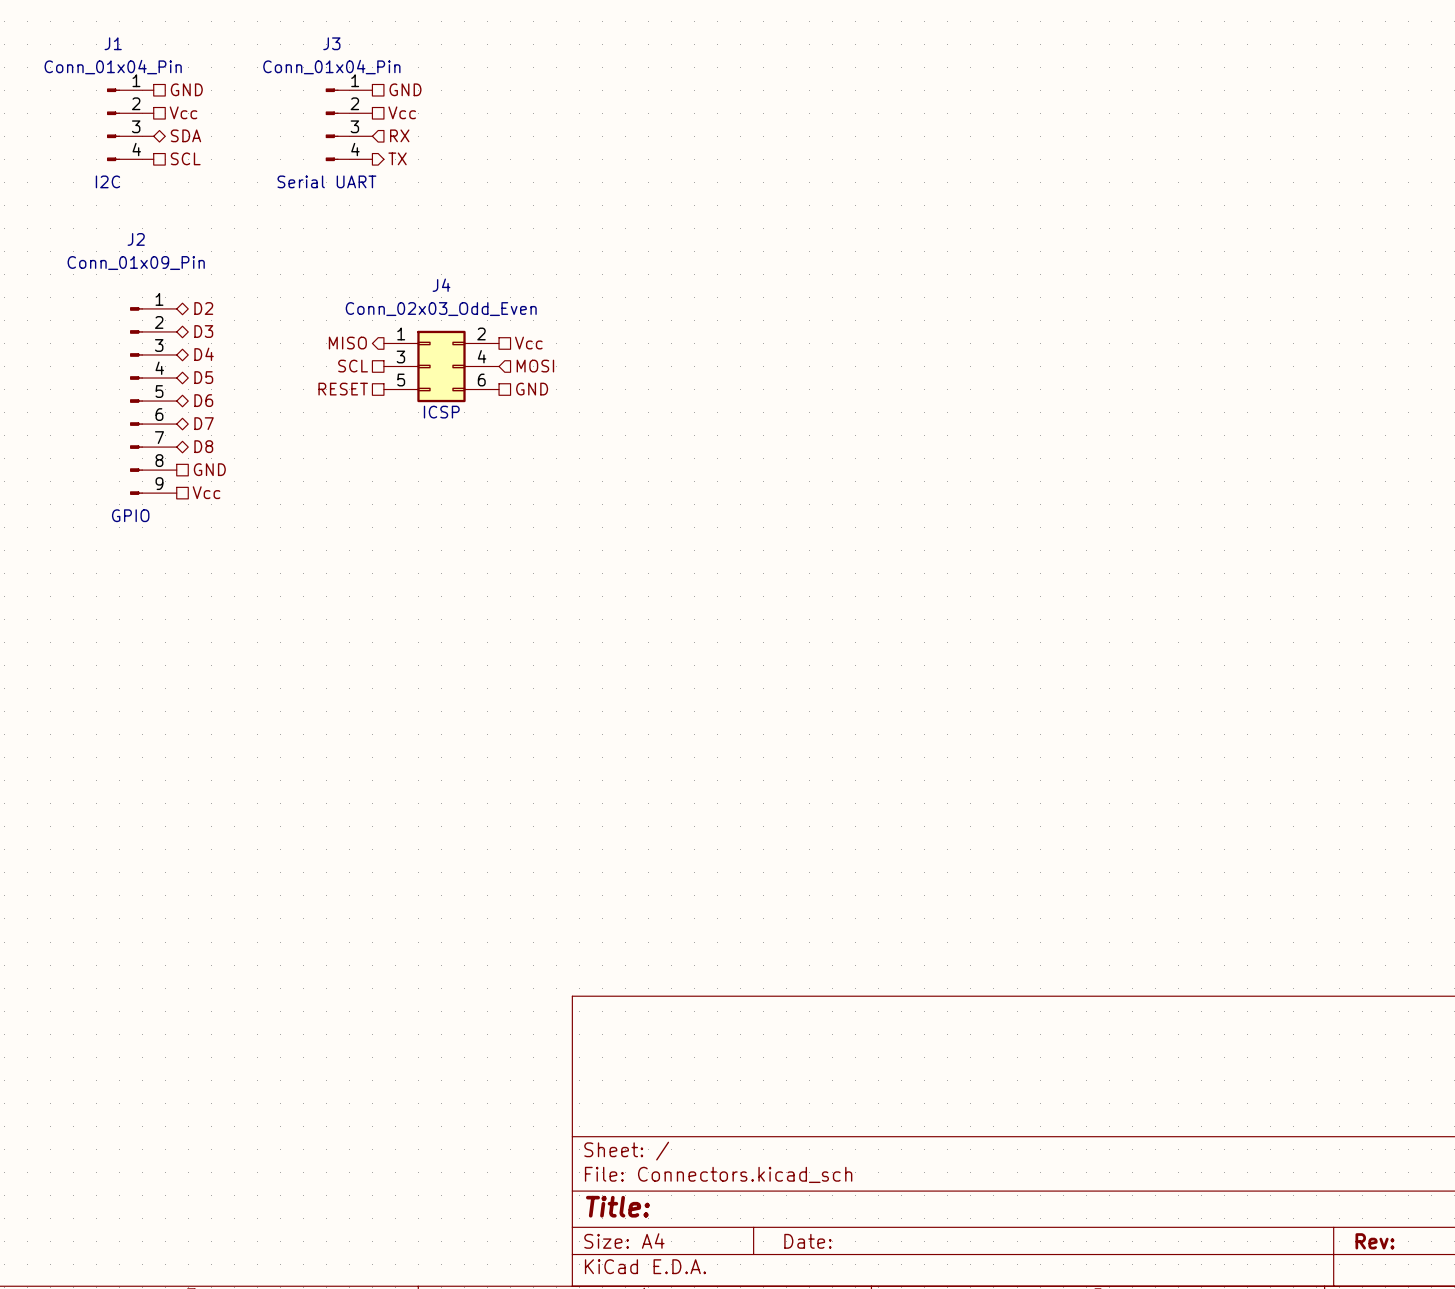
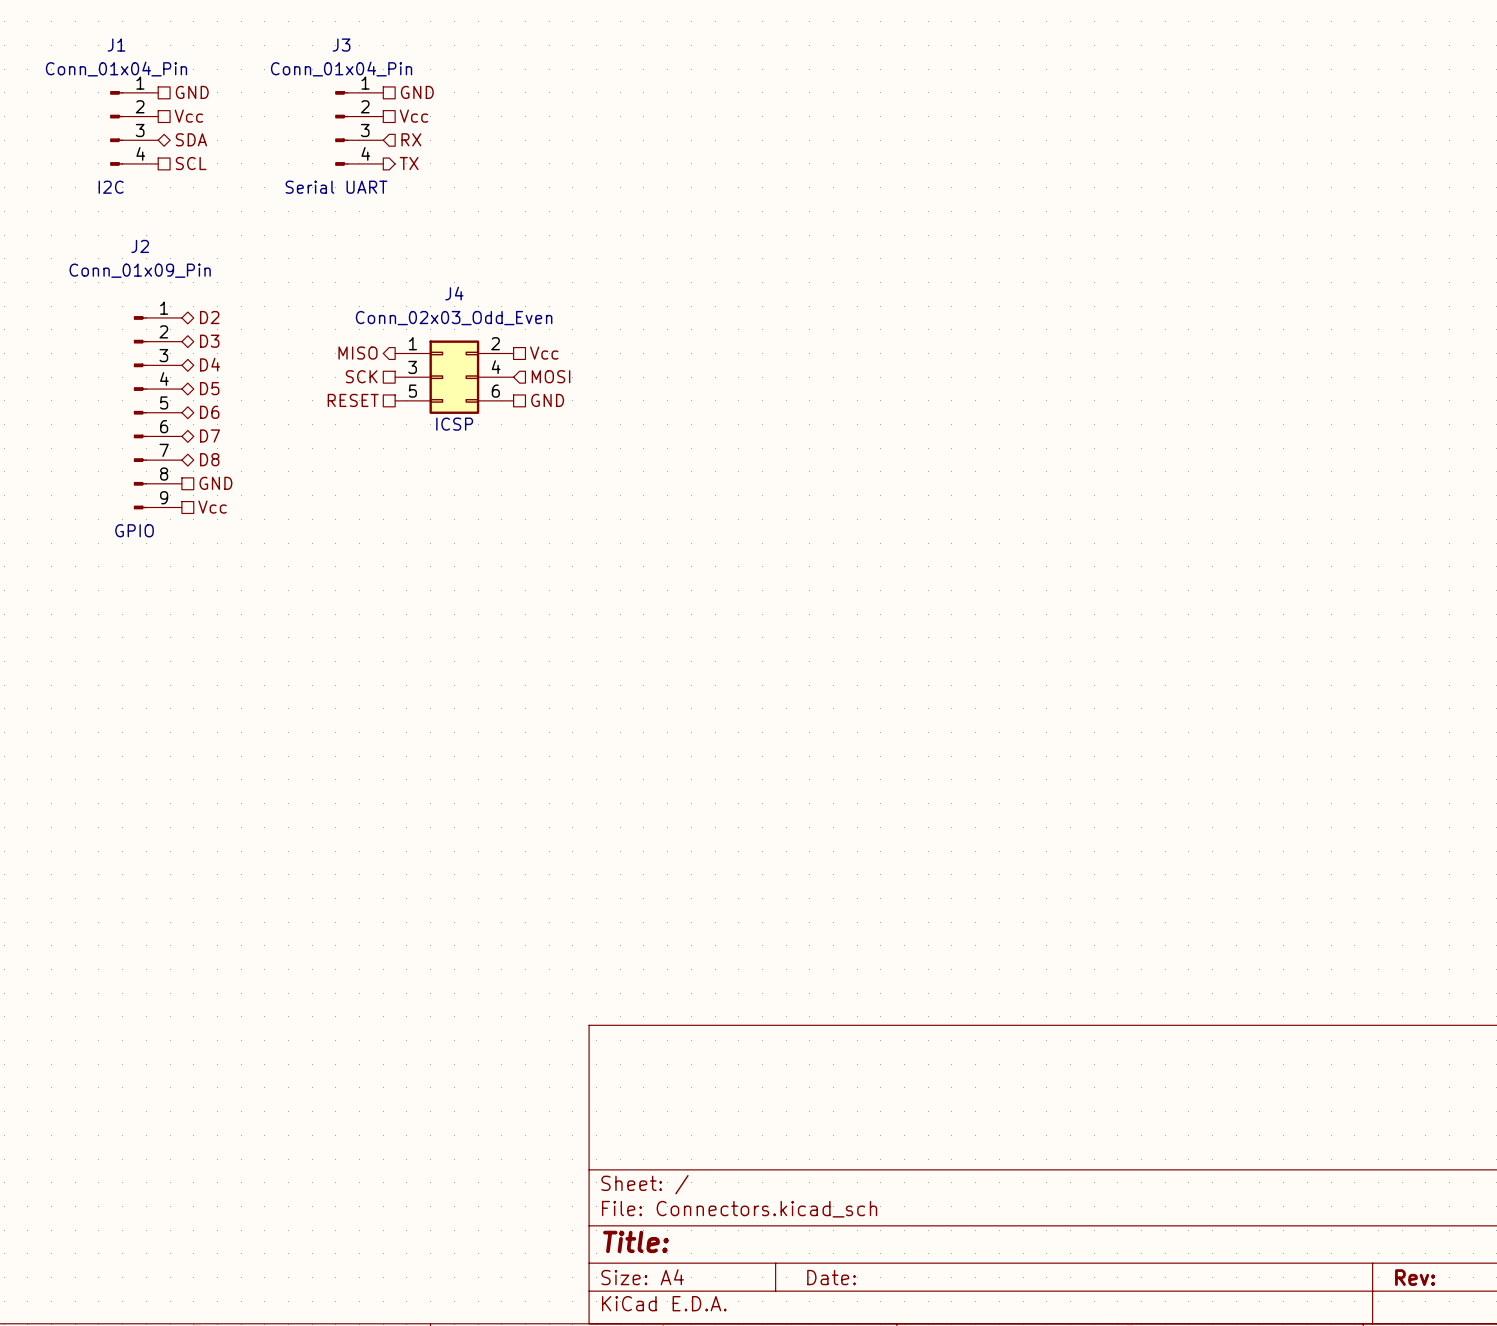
hierarchical label: SCL (353, 366) -> SCK (361, 376)

